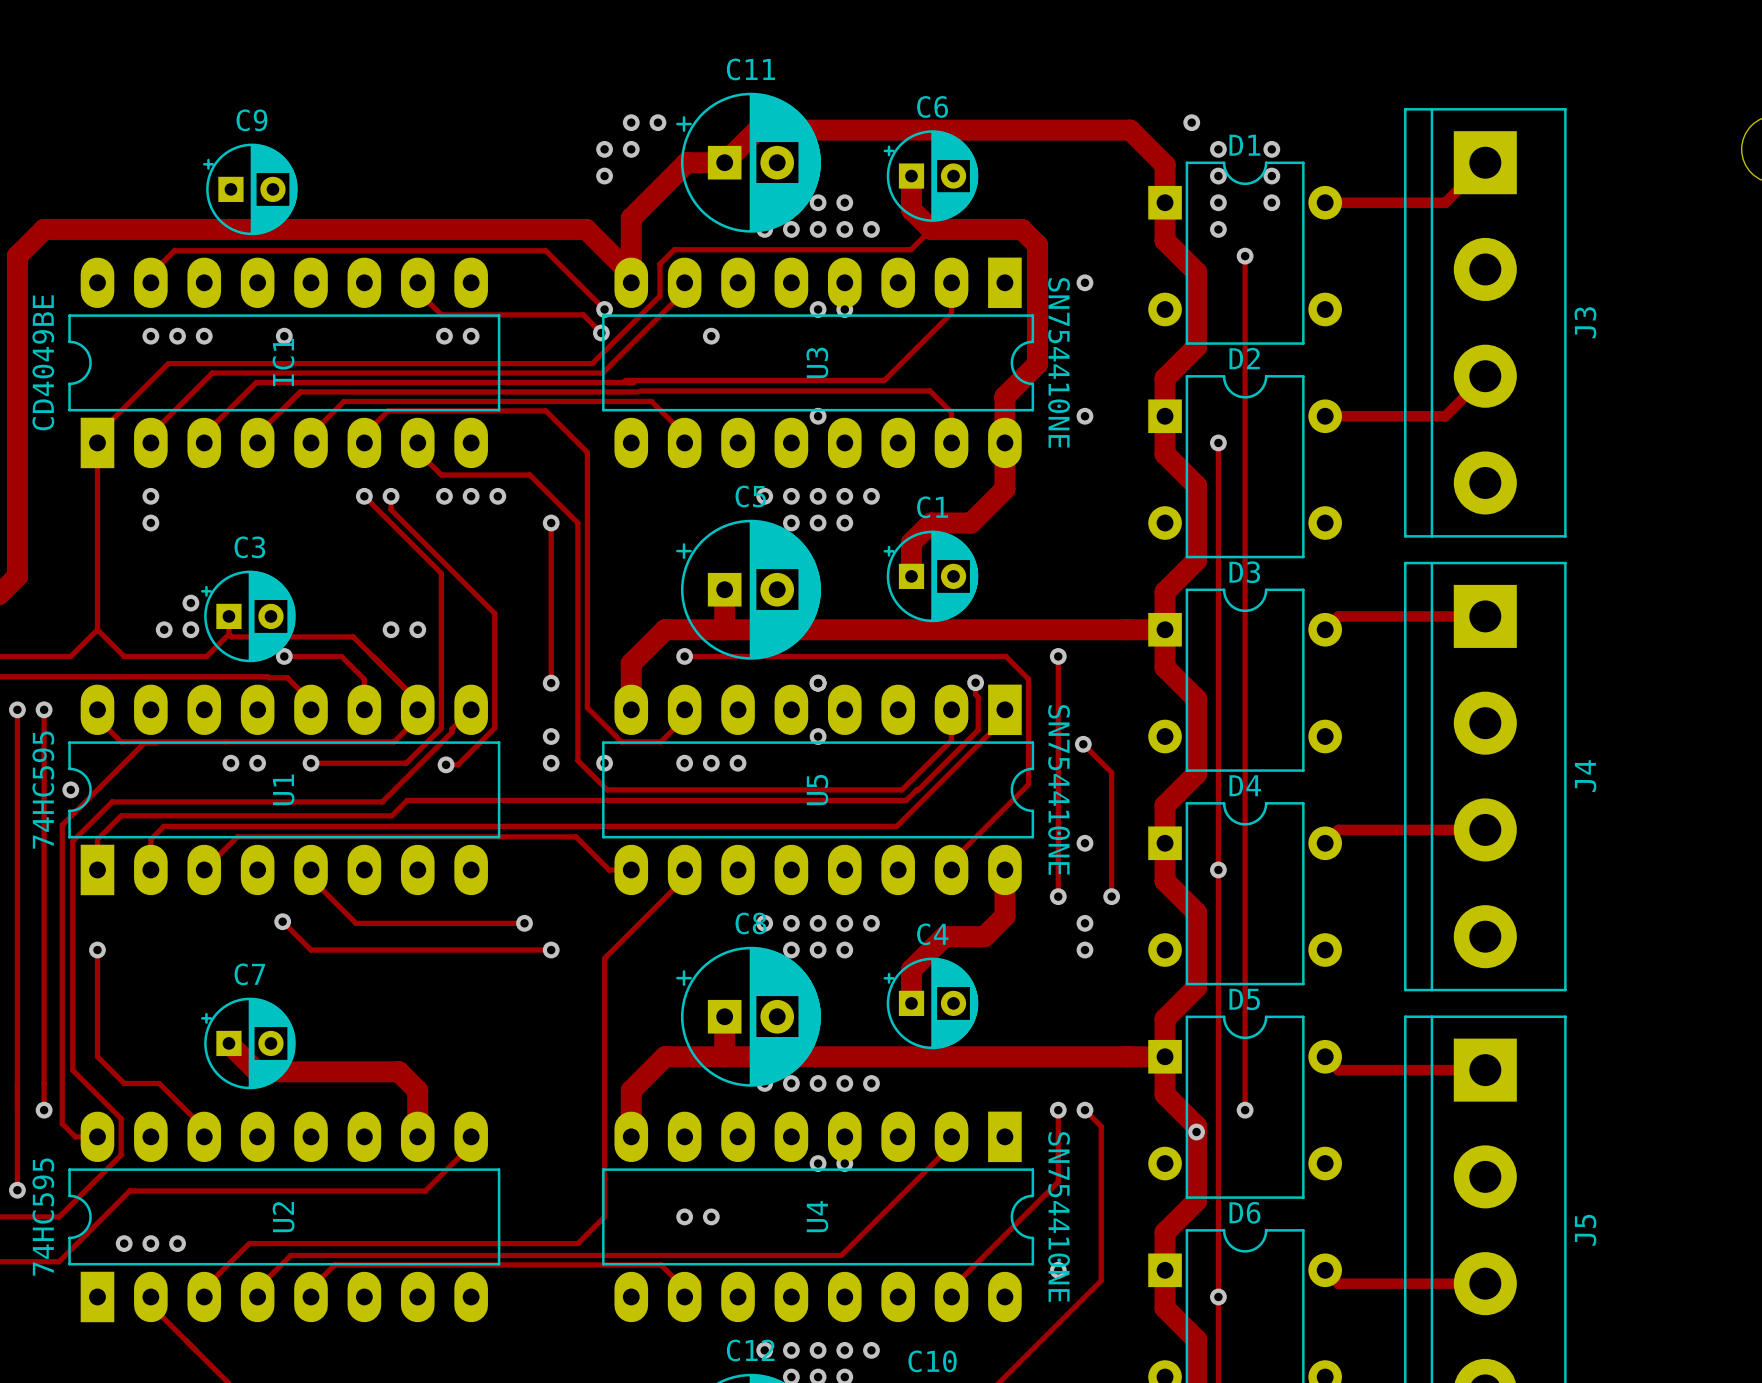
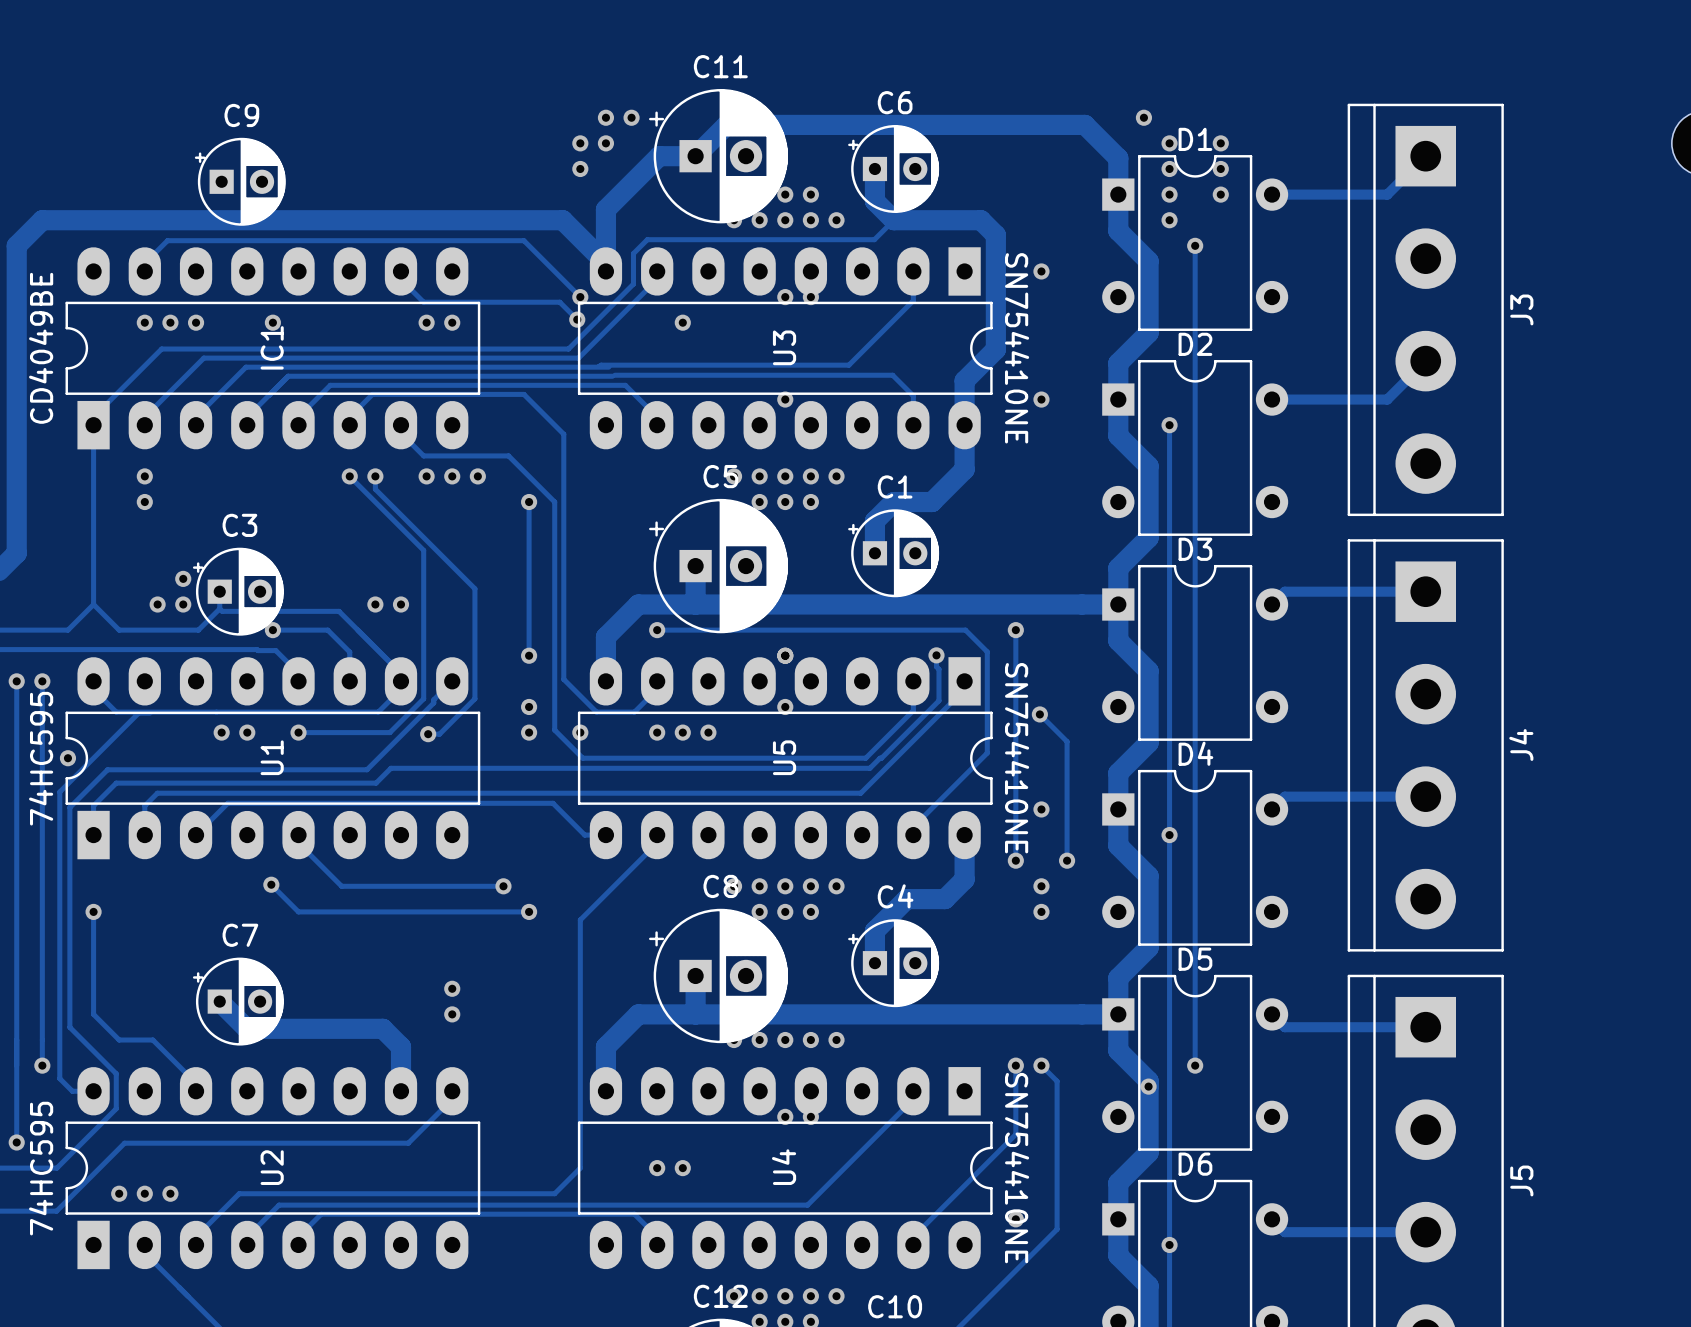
via: none -> (452, 988)
via: none -> (452, 1014)

